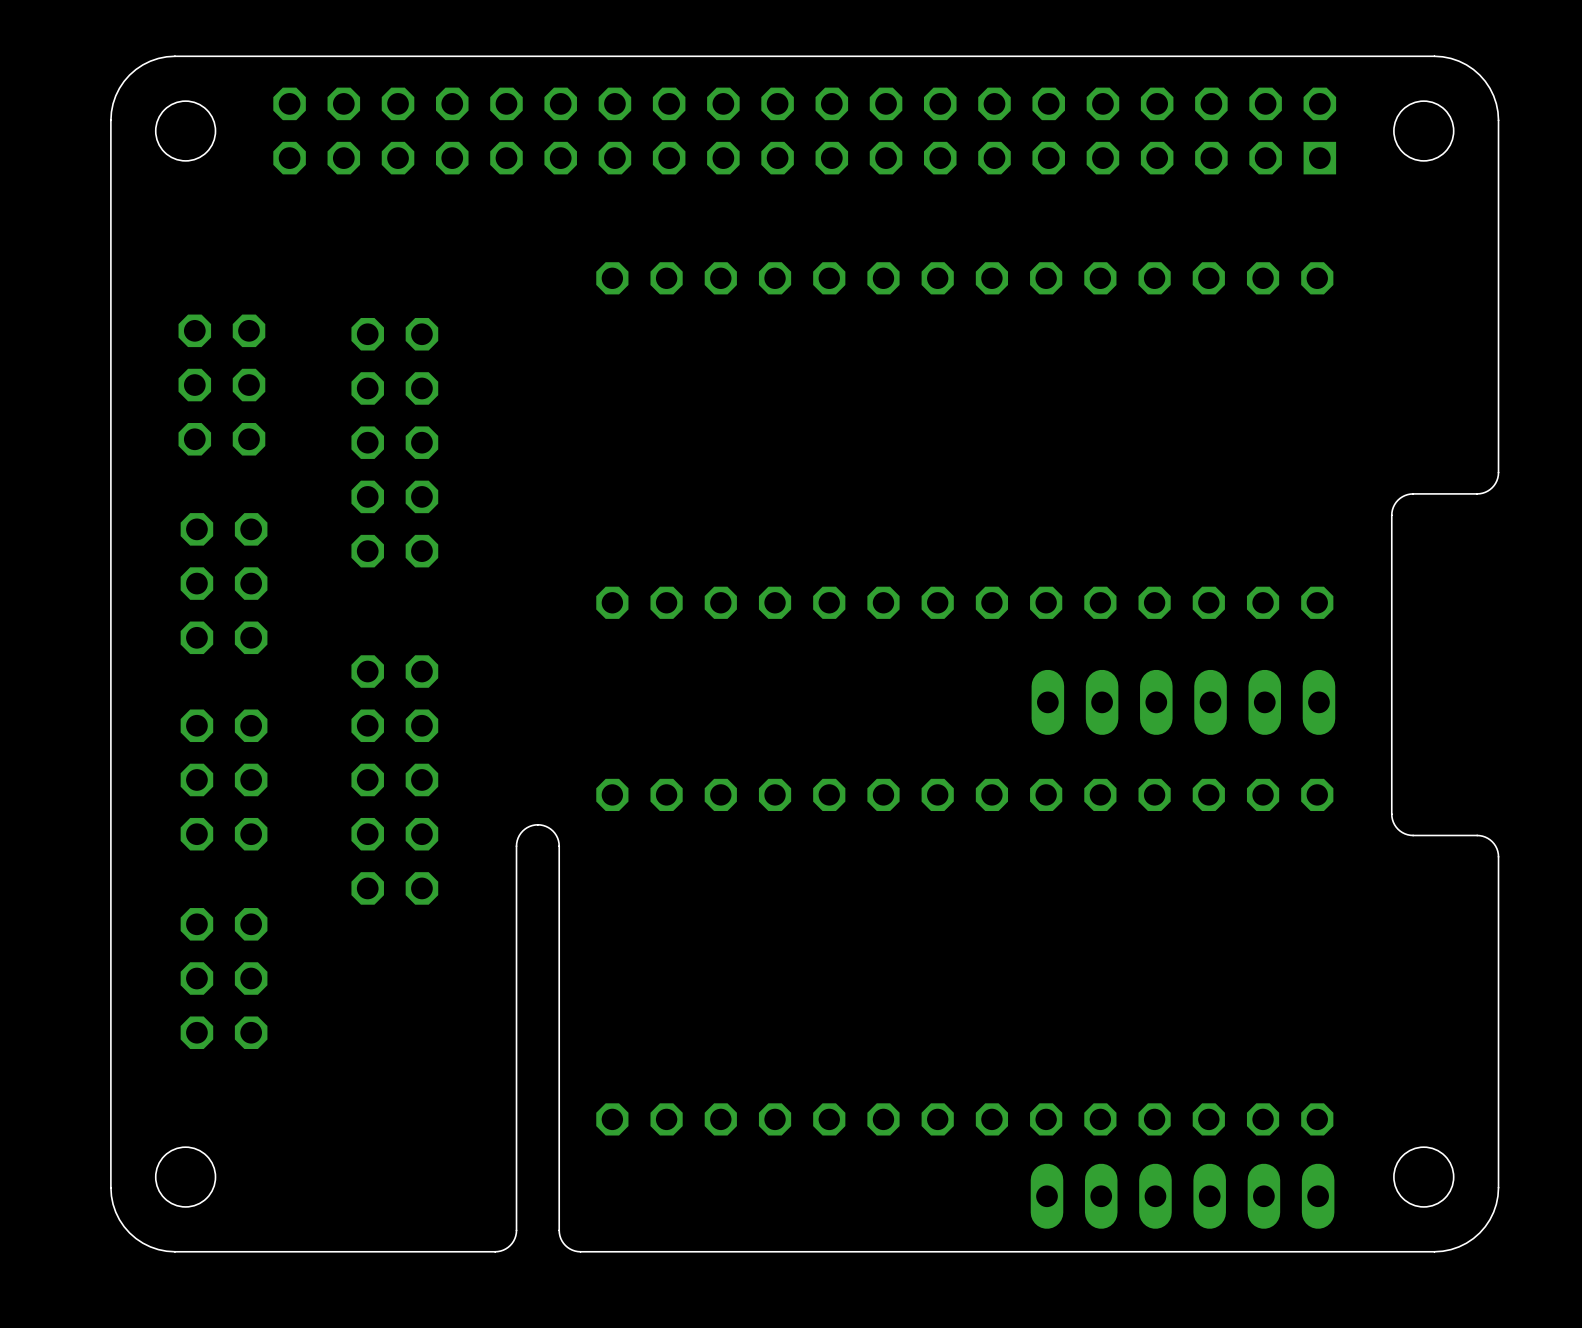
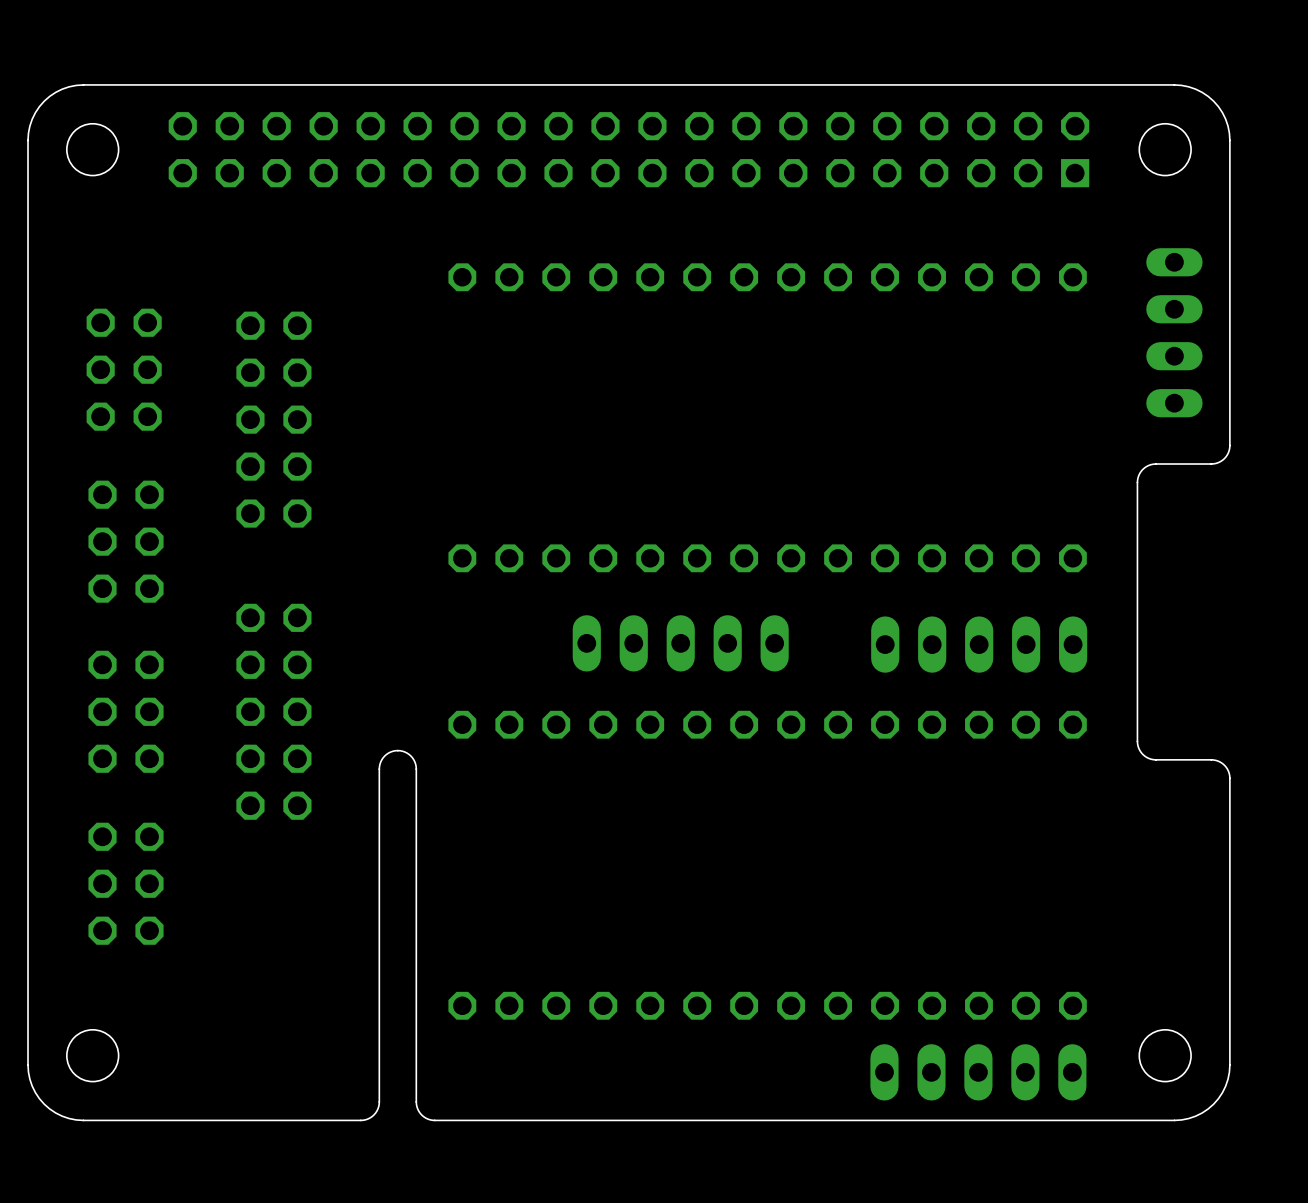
part: none -> (1174, 332)
part: none -> (680, 643)
part: (1183, 702) -> none
part: none -> (979, 644)
part: (1182, 1196) -> none
part: none -> (978, 1072)

